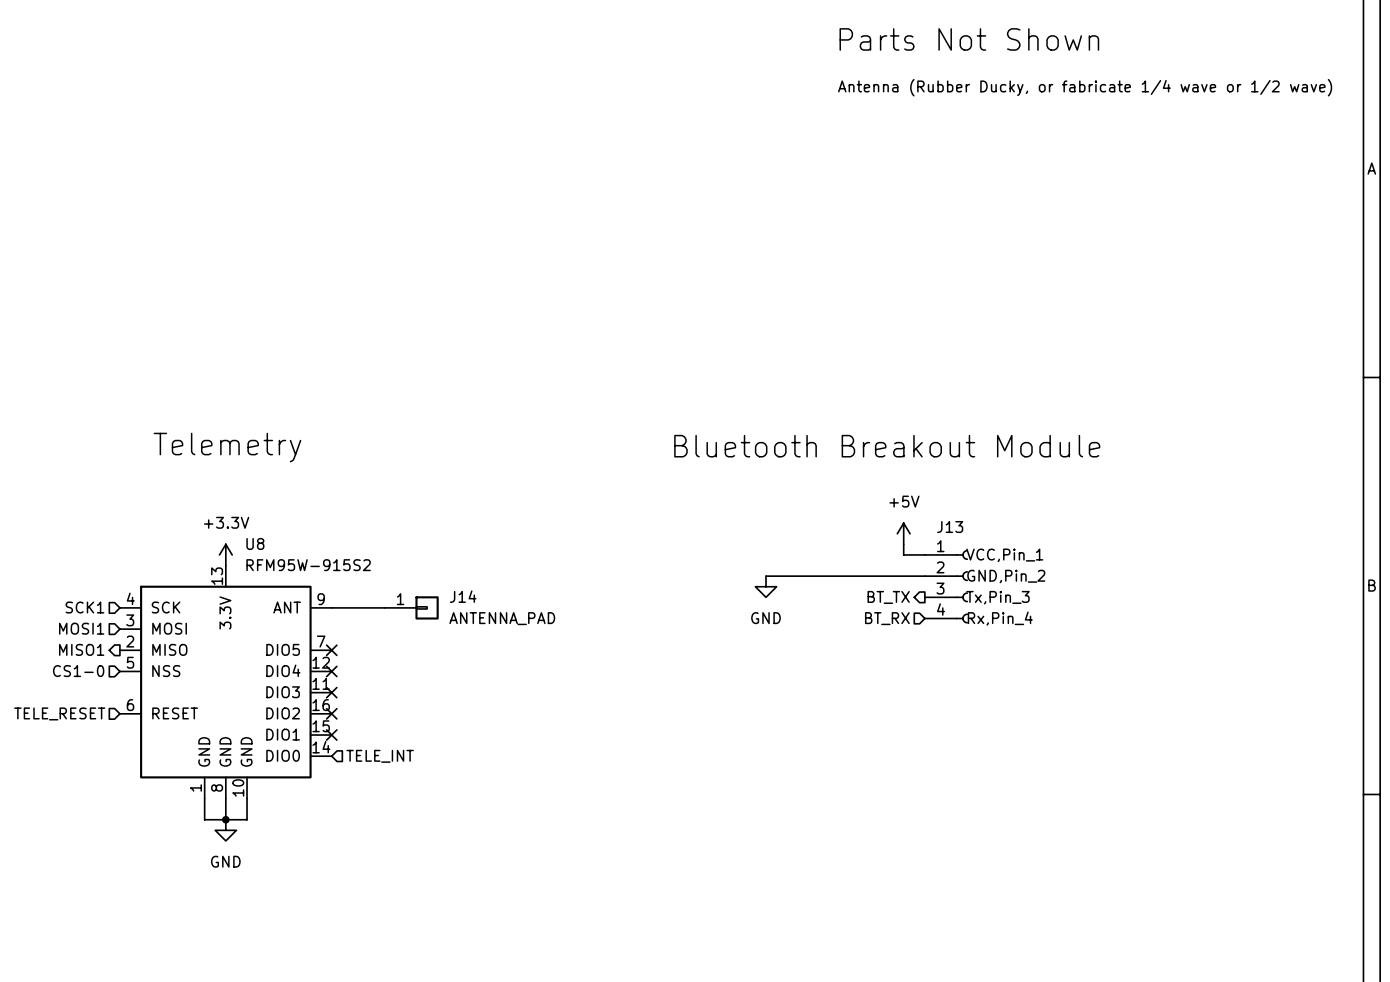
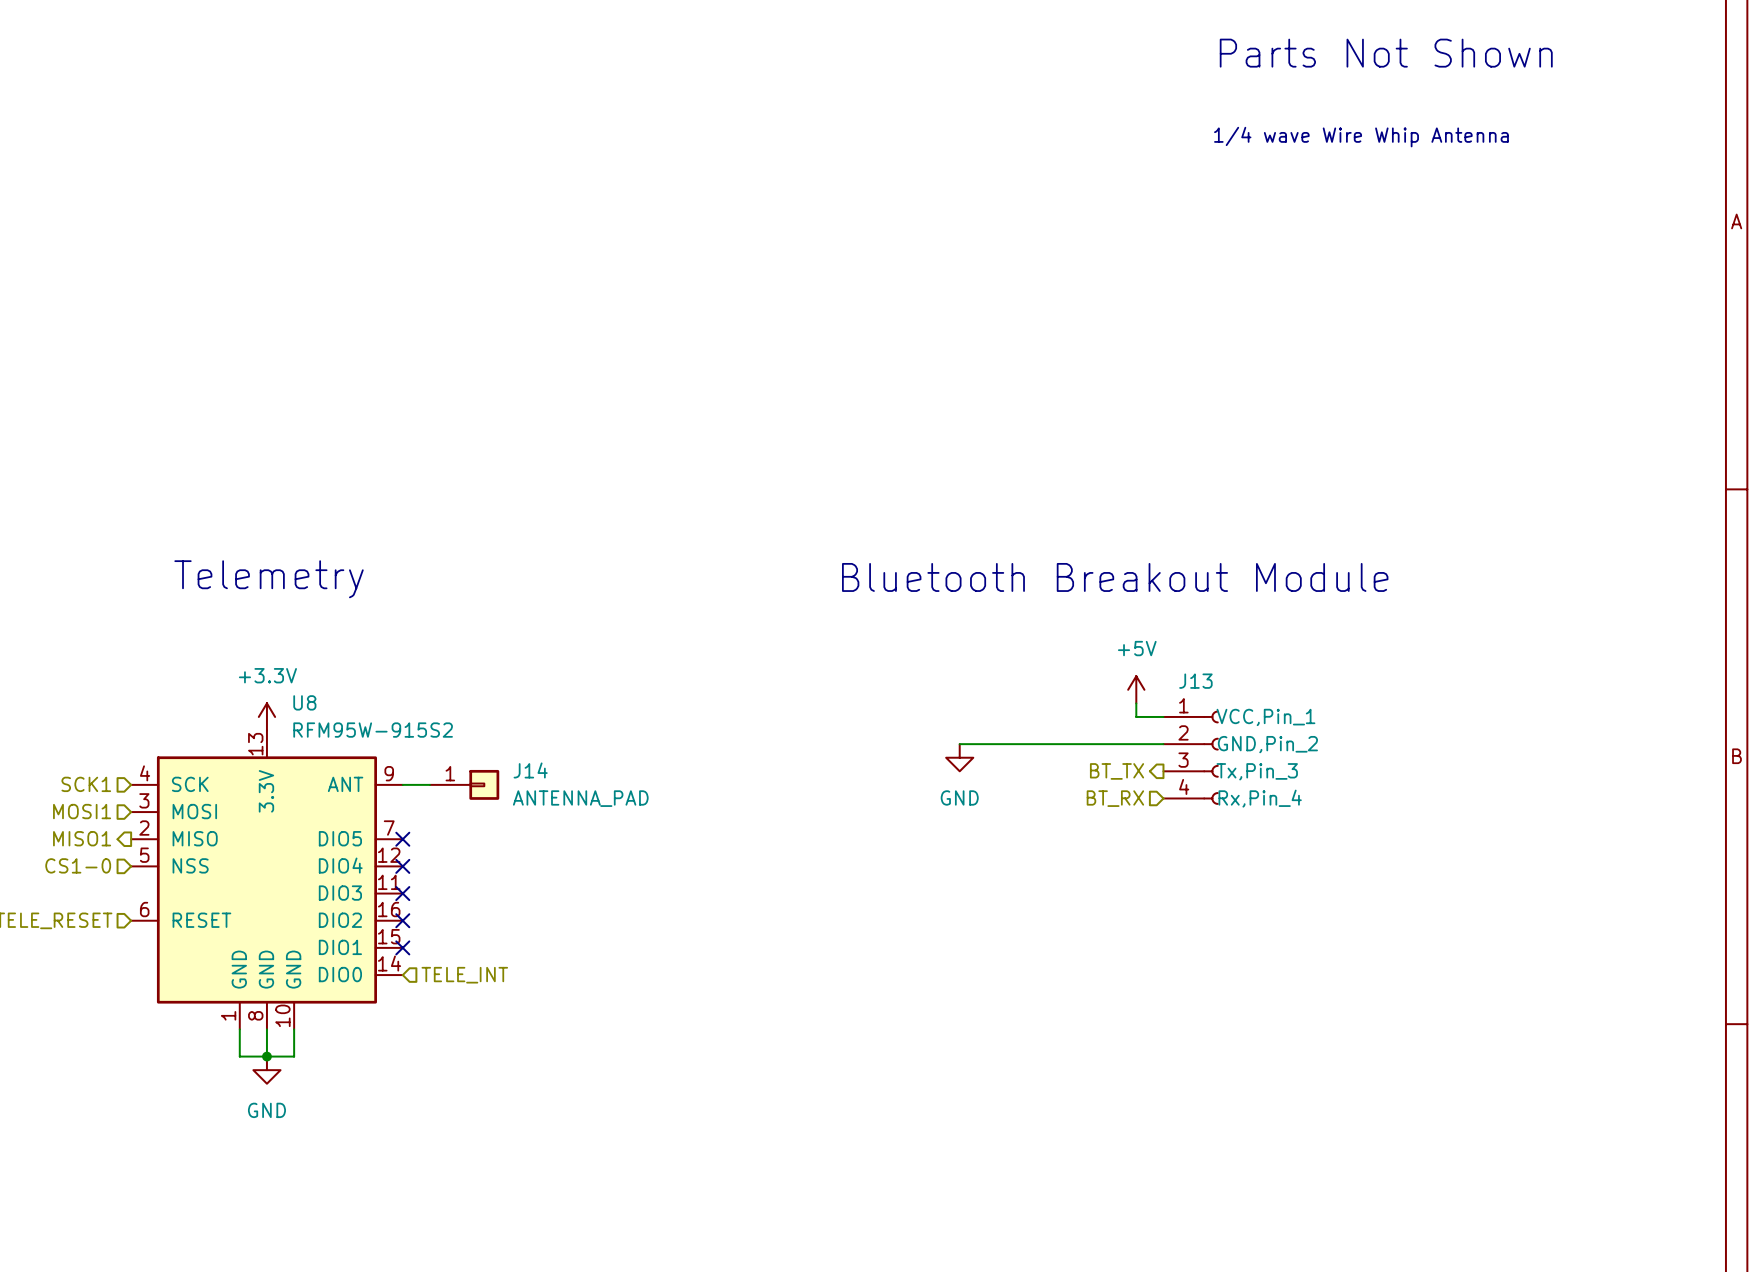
text position: Parts Not Shown (969, 39) -> Parts Not Shown (1386, 53)
text: Antenna (Rubber Ducky, or fabricate 1/4 wave or 1/2 wave) (1085, 87) -> none
text: none -> 1/4 wave Wire Whip Antenna (1361, 137)
J14 position: (411, 607) -> (464, 784)

